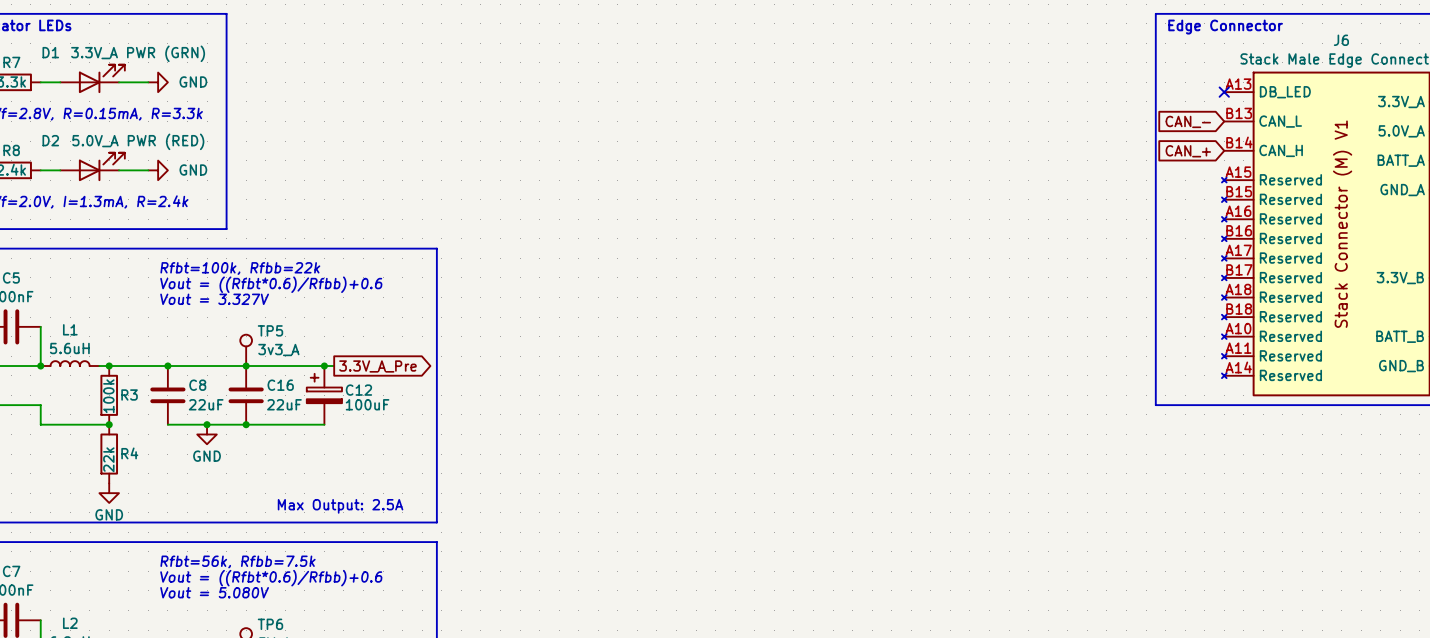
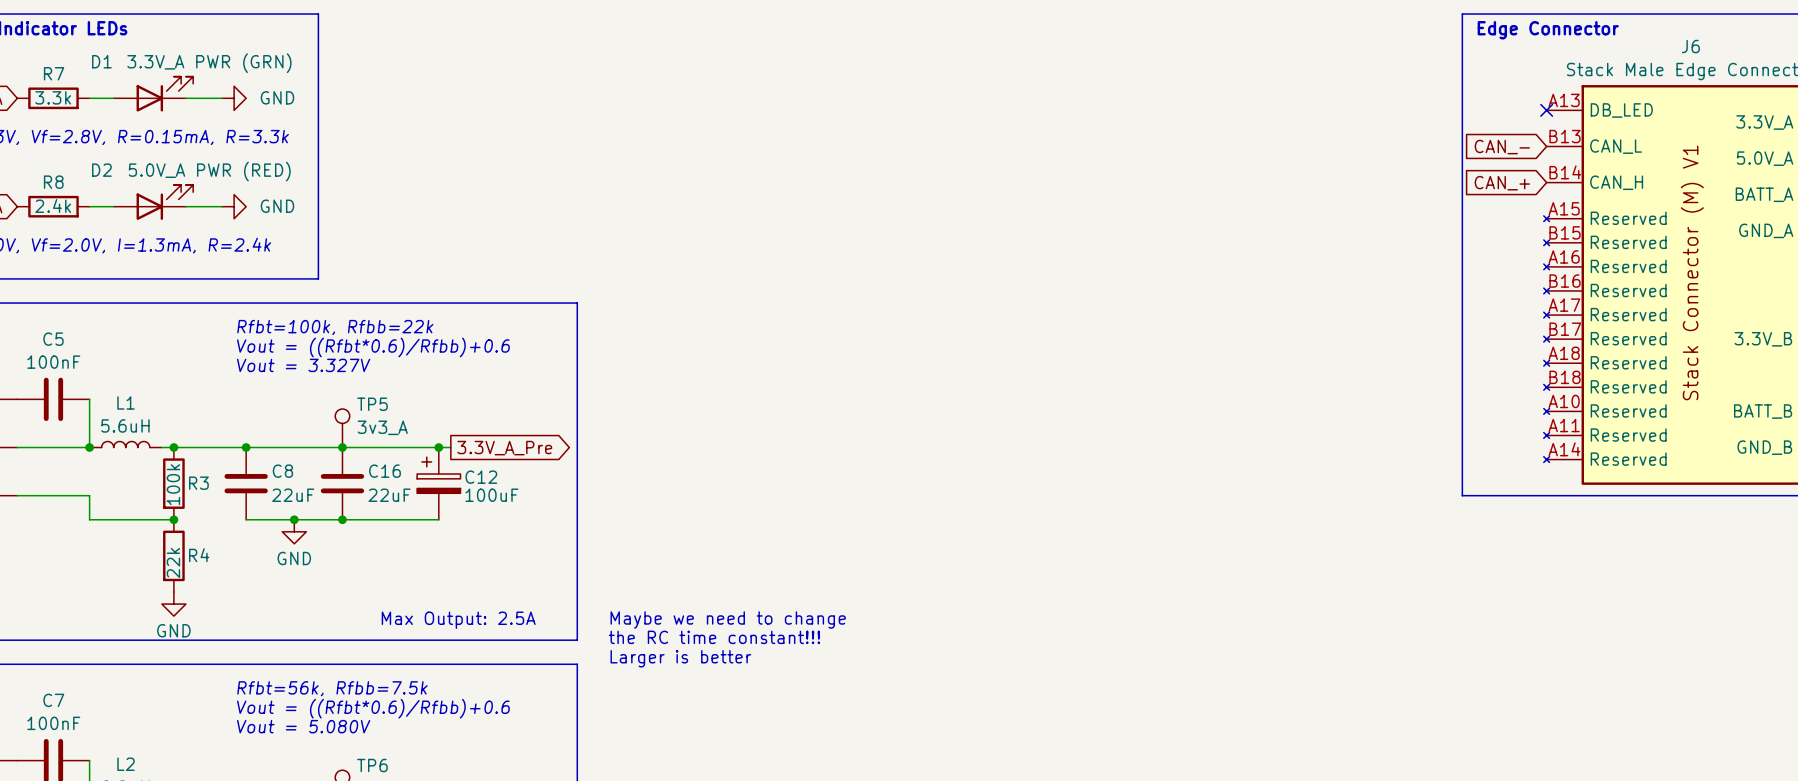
text: none -> Maybe we need to change (728, 619)
text: none -> the RC time constant!!! (714, 637)
text: none -> Larger is better (680, 658)

